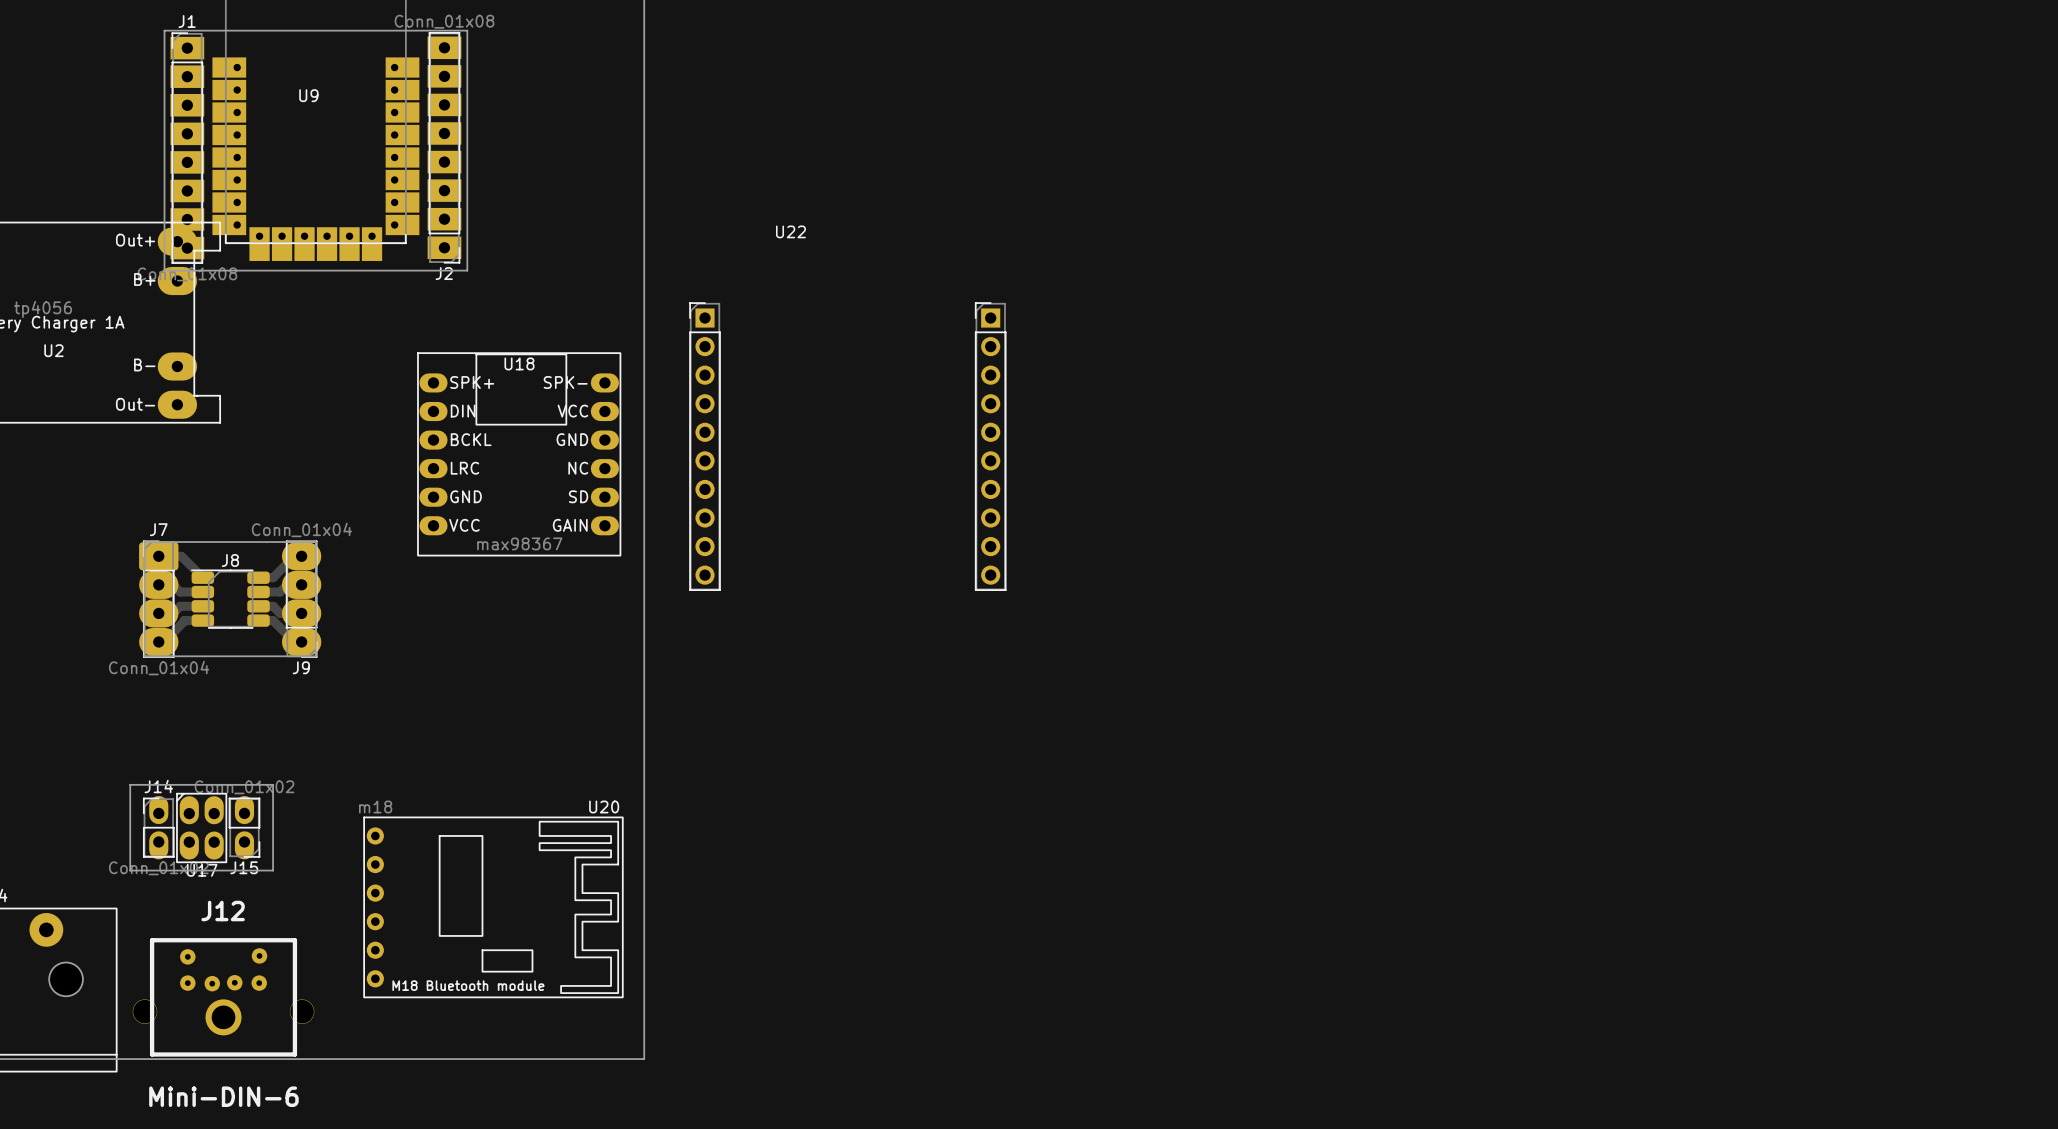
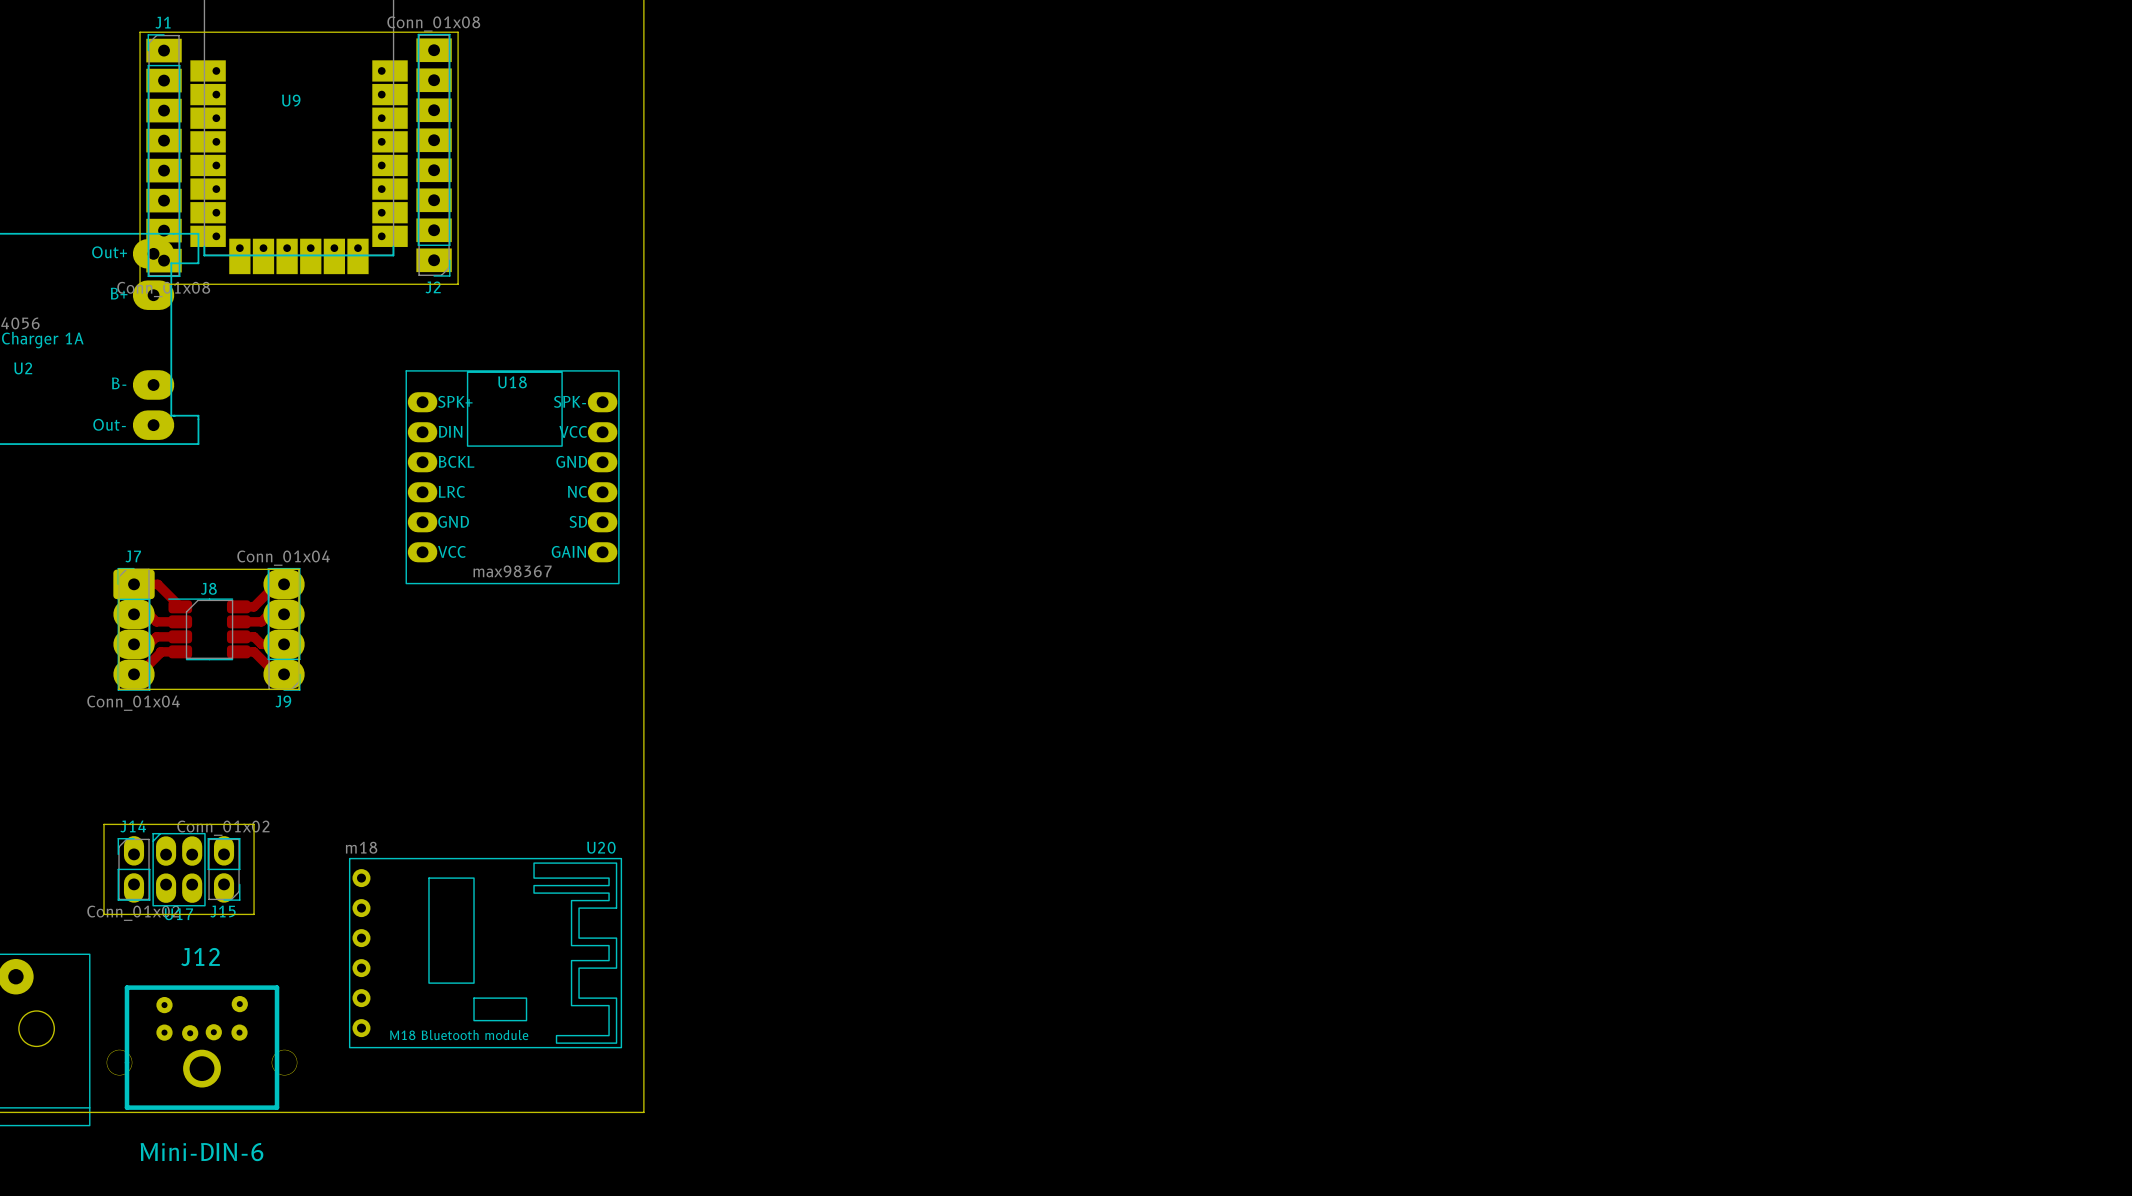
U22: (847, 446) -> none

